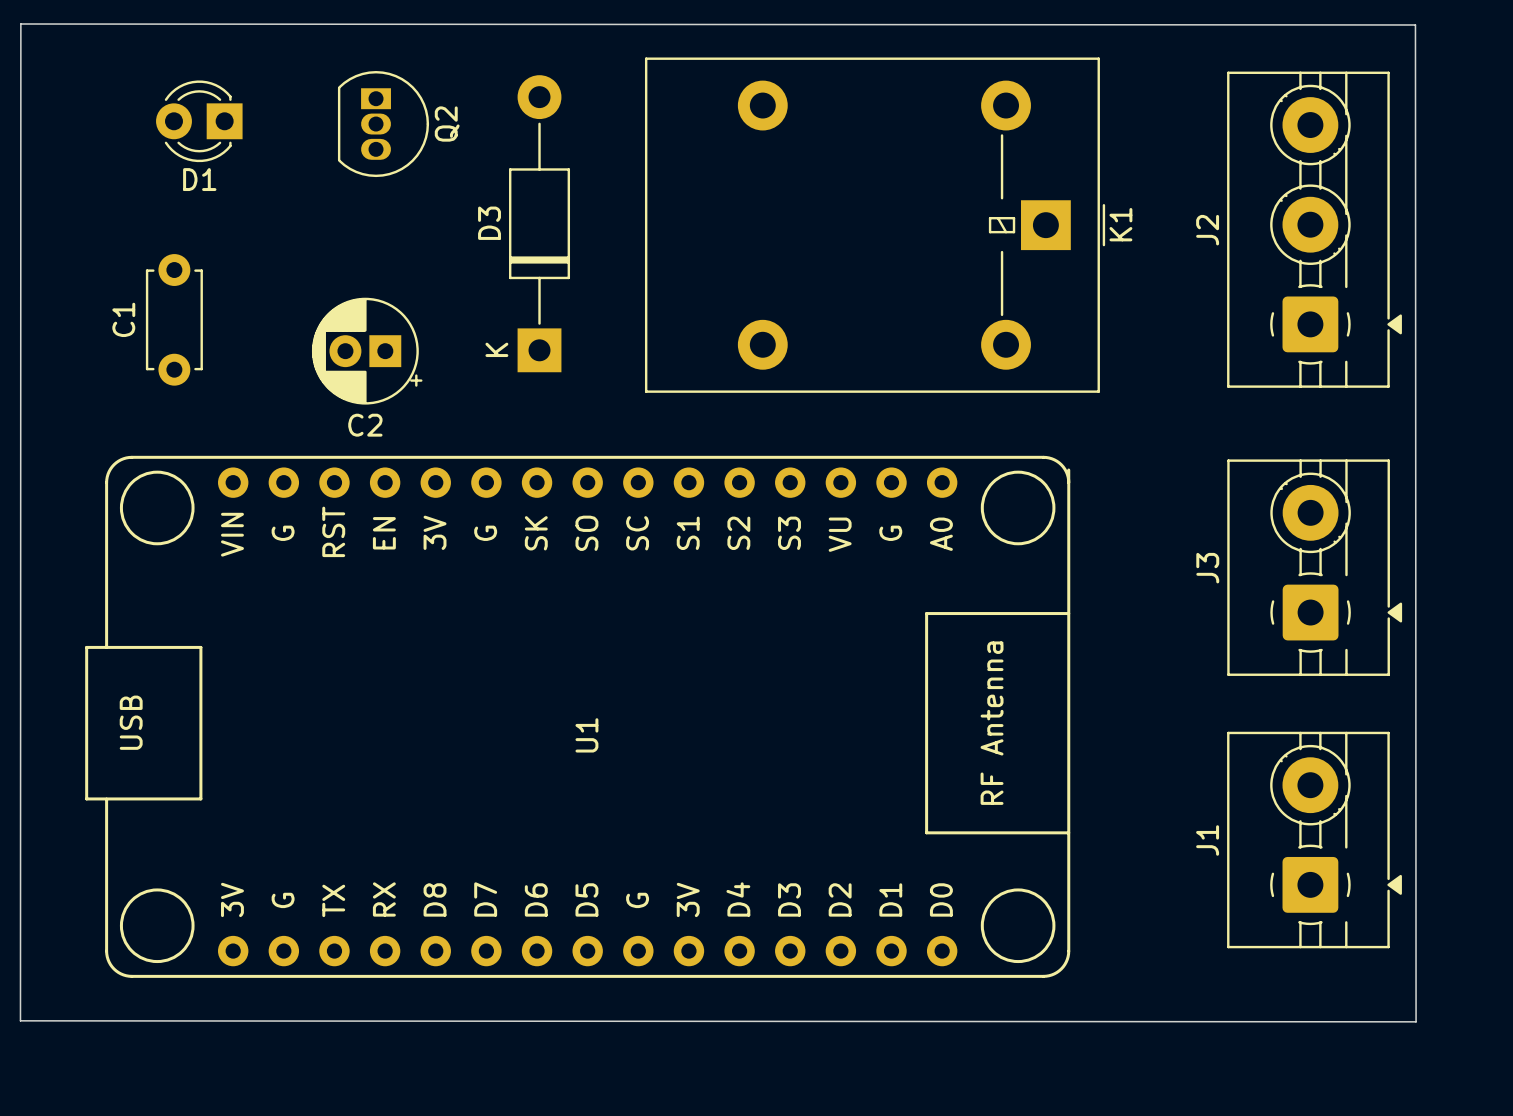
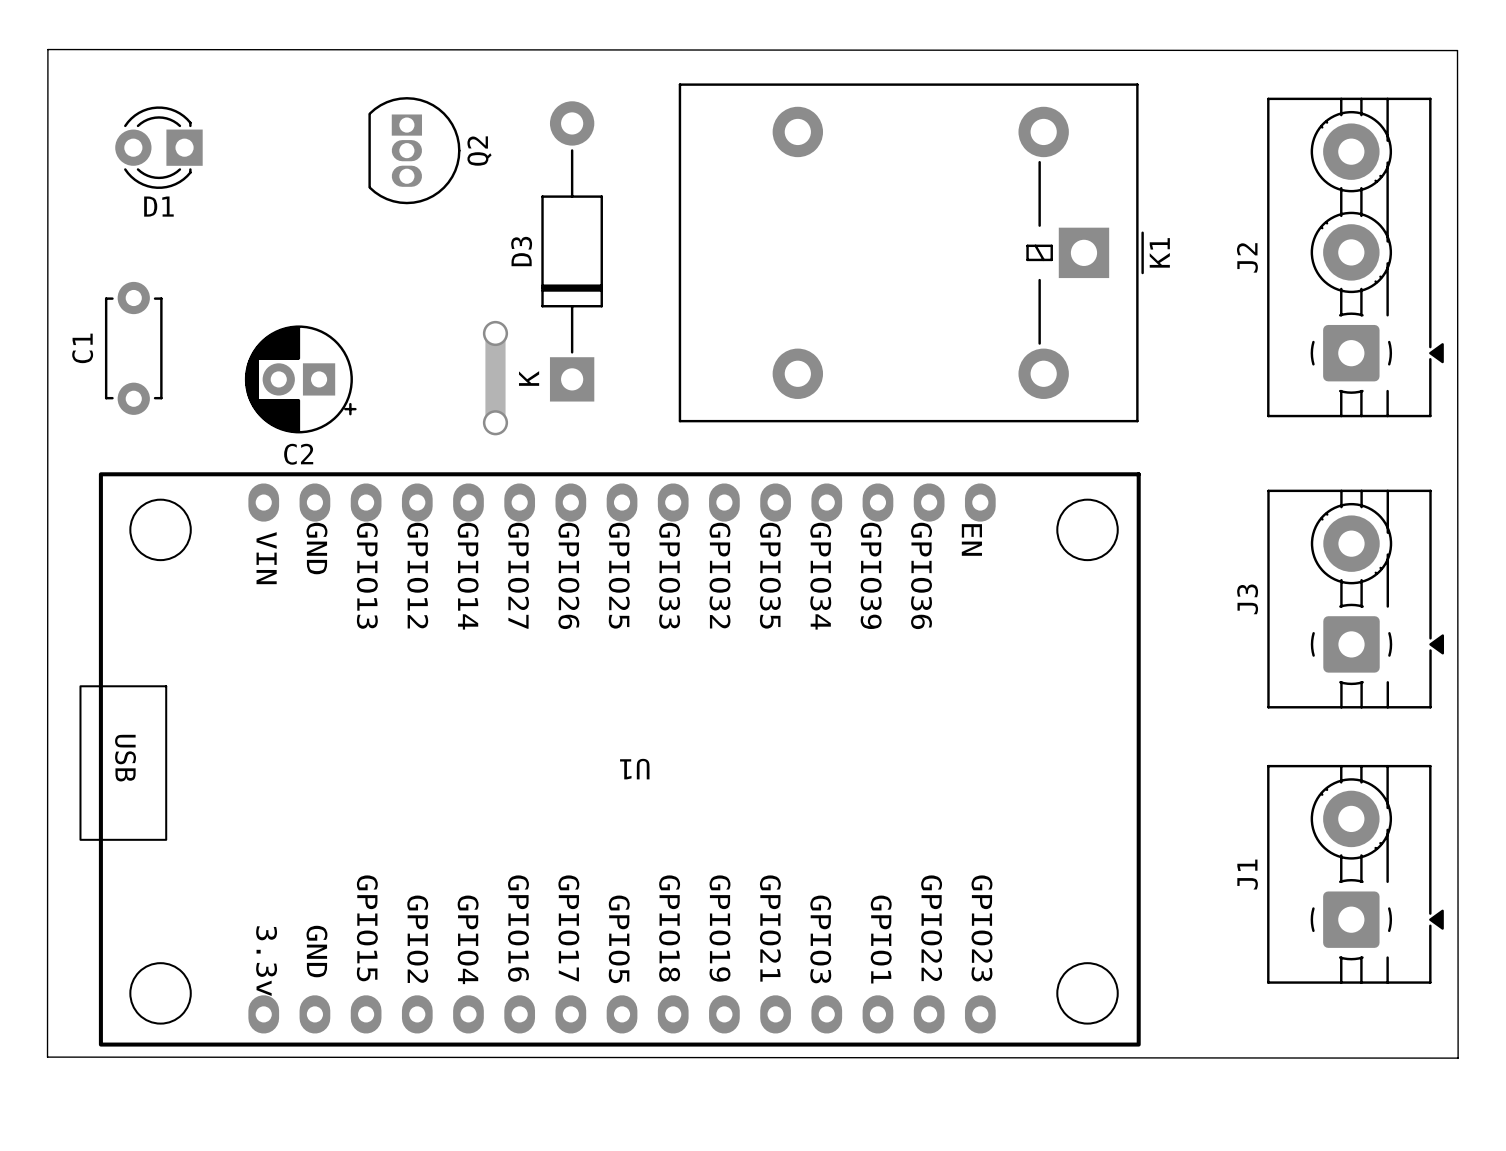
D1 position: (199, 121) -> (158, 147)
track: none -> (495, 333) (495, 422)
via: none -> (495, 333)
C1 position: (174, 319) -> (133, 348)
C2 position: (367, 351) -> (300, 379)
via: none -> (495, 422)
U1 footprint: [85, 455, 1071, 978] -> [79, 472, 1141, 1047]

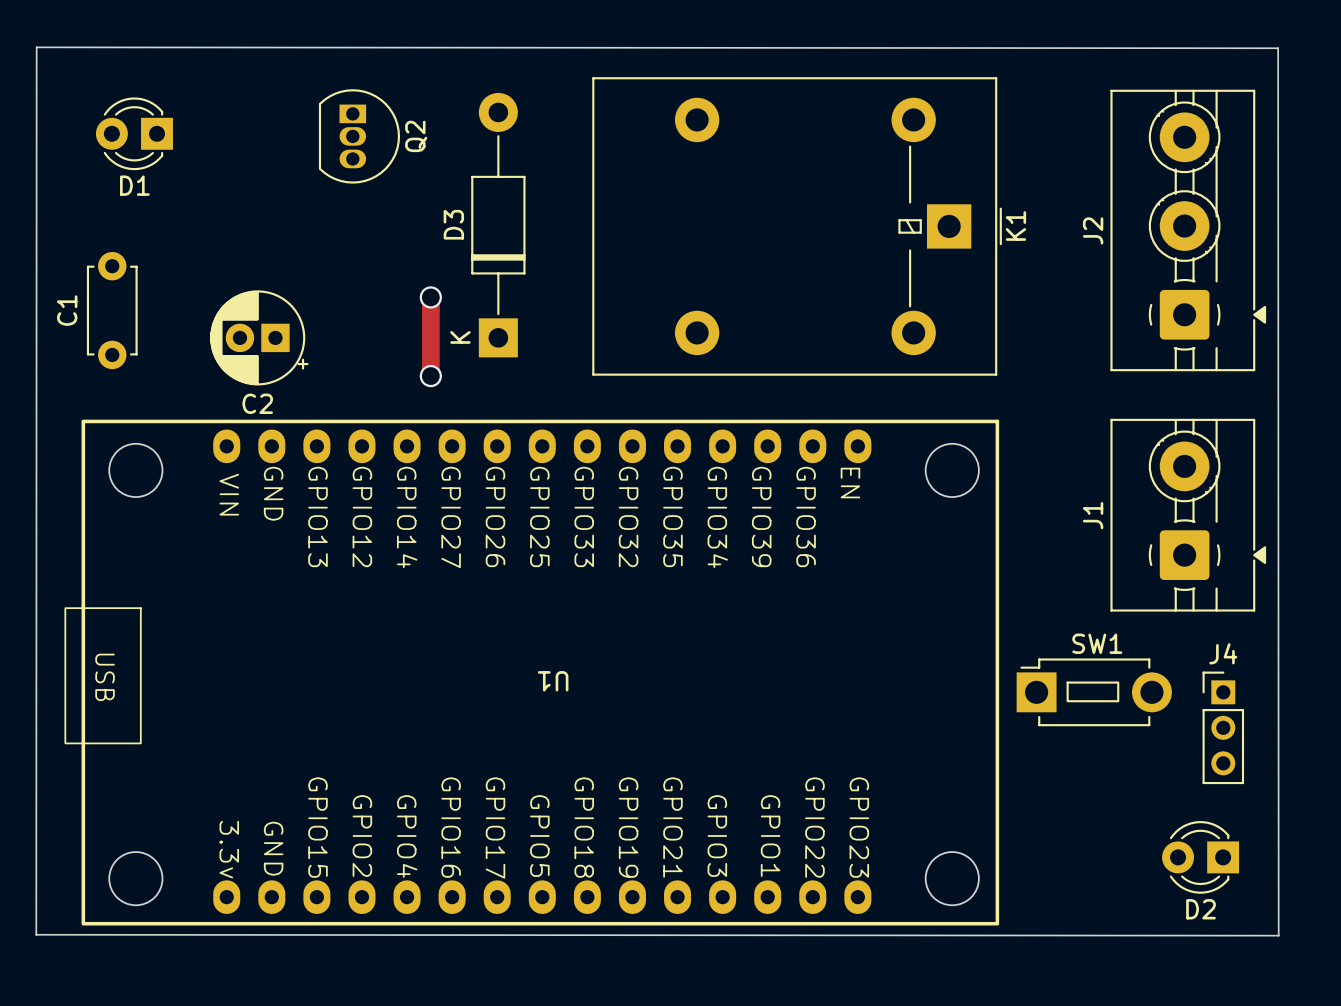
J3: (1355, 599) -> none
SW1: none -> (1094, 692)
J4: none -> (1223, 727)
J1 position: (1355, 874) -> (1188, 515)
D2: none -> (1200, 857)

